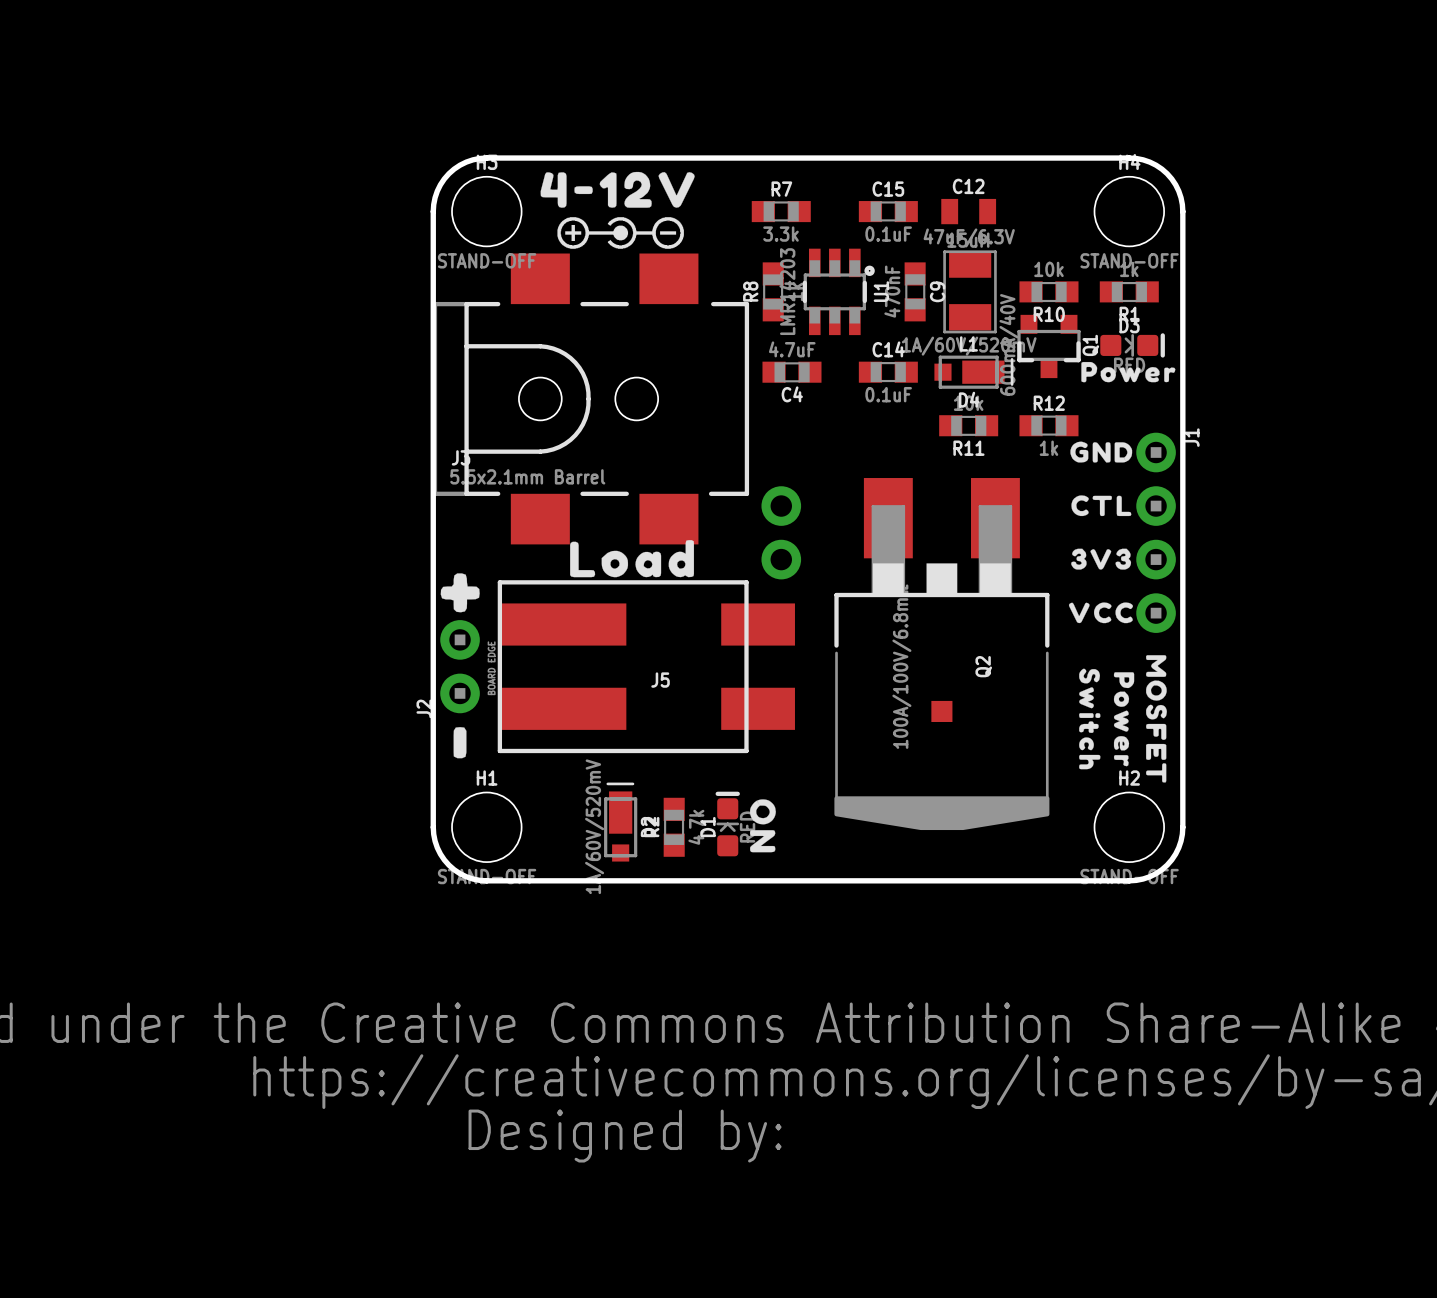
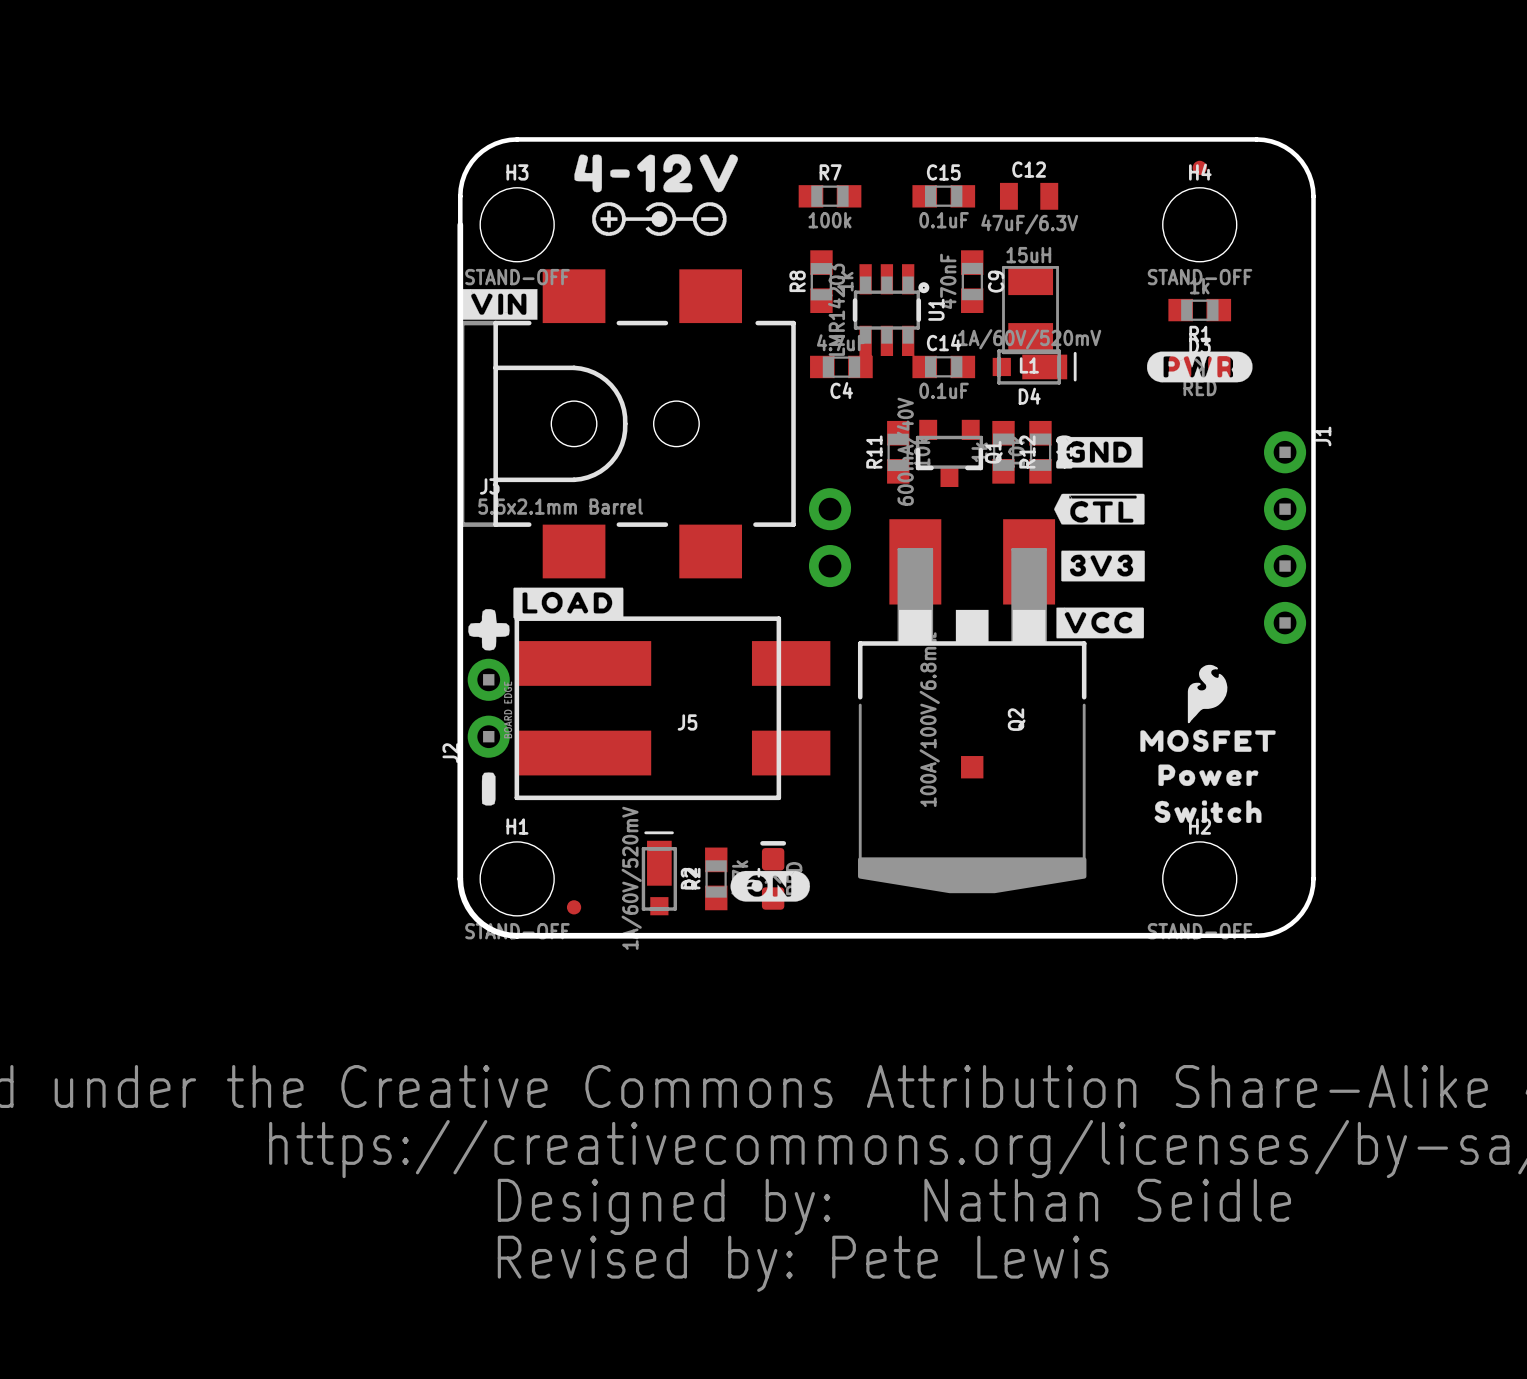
part: none -> (1199, 167)
drawing position: (617, 189) -> (656, 173)
board edge: (433, 211) (437, 191) (448, 173) (466, 162) (486, 158) (1129, 158) (1149, 162) (1167, 173) (1178, 191) (1182, 211) (1182, 827) (1178, 847) (1167, 865) (1149, 876) (1129, 880) -> (460, 224) (460, 188) (467, 167) (482, 151) (495, 143) (509, 139) (1256, 139) (1278, 143) (1296, 156) (1309, 174) (1313, 196) (1313, 886) (1309, 900) (1301, 913) (1291, 924) (1278, 931) (1256, 935) (1199, 935)
R7 position: (781, 211) -> (830, 196)
C15 position: (888, 211) -> (943, 196)
C12 position: (968, 211) -> (1029, 196)
drawing position: (620, 232) -> (659, 219)
R7 value: 3.3k (781, 234) -> 100k (830, 220)
drawing: none -> [462, 289, 538, 320]
R8 position: (773, 291) -> (821, 281)
C9 position: (915, 291) -> (972, 281)
R10 rotation: 0° (1048, 291) -> 90° clockwise (1040, 452)
R10 position: (1048, 291) -> (1040, 452)
drawing: none -> [1147, 351, 1253, 383]
Q1 position: (1048, 346) -> (949, 453)
C4 position: (791, 372) -> (841, 366)
C14 position: (888, 372) -> (943, 366)
D4 position: (973, 372) -> (1034, 366)
drawing position: (1128, 372) -> (1208, 775)
drawing: none -> [1054, 436, 1145, 639]
R11 rotation: 0° (968, 425) -> 90° clockwise (898, 452)
R11 position: (968, 425) -> (898, 452)
R12 rotation: 0° (1048, 425) -> 90° clockwise (1003, 452)
R12 position: (1048, 425) -> (1003, 452)
drawing: [1070, 441, 1133, 463] -> none
drawing: [1071, 495, 1132, 517] -> none
part position: (781, 532) -> (830, 537)
J1 position: (1156, 532) -> (1285, 537)
drawing: [570, 540, 695, 578] -> none
drawing: [1071, 548, 1132, 570] -> none
drawing: none -> [513, 587, 624, 619]
drawing: [1068, 602, 1133, 624] -> none
drawing: none -> [1140, 664, 1276, 752]
Q2 position: (941, 654) -> (972, 706)
drawing: [1079, 655, 1167, 783] -> none
J5 position: (646, 666) -> (672, 708)
drawing: none -> [1154, 800, 1262, 823]
drawing: [750, 799, 776, 853] -> none
drawing: none -> [730, 870, 811, 902]
part: none -> (574, 907)
text: none -> Nathan Seidle (1107, 1200)
text: none -> Revised by: Pete Lewis (803, 1263)

